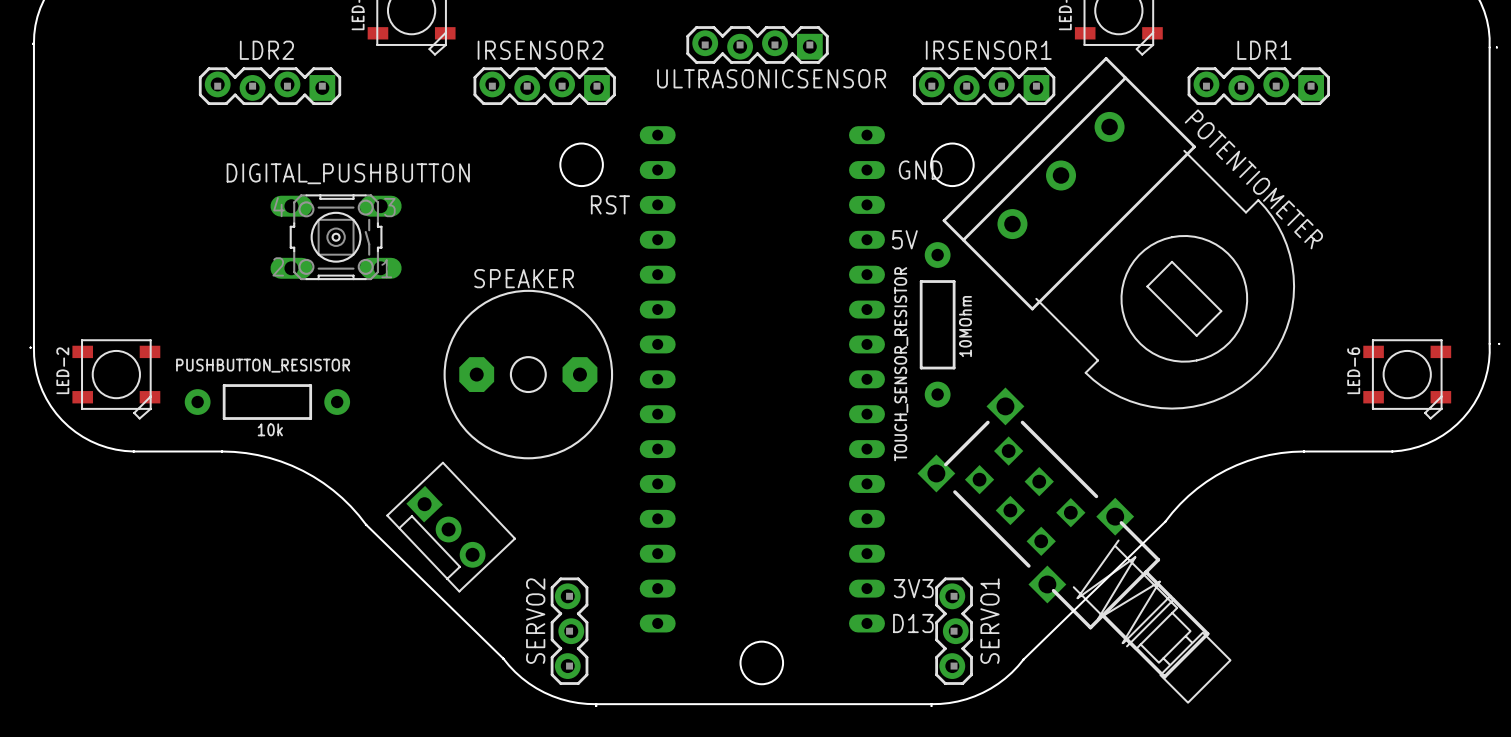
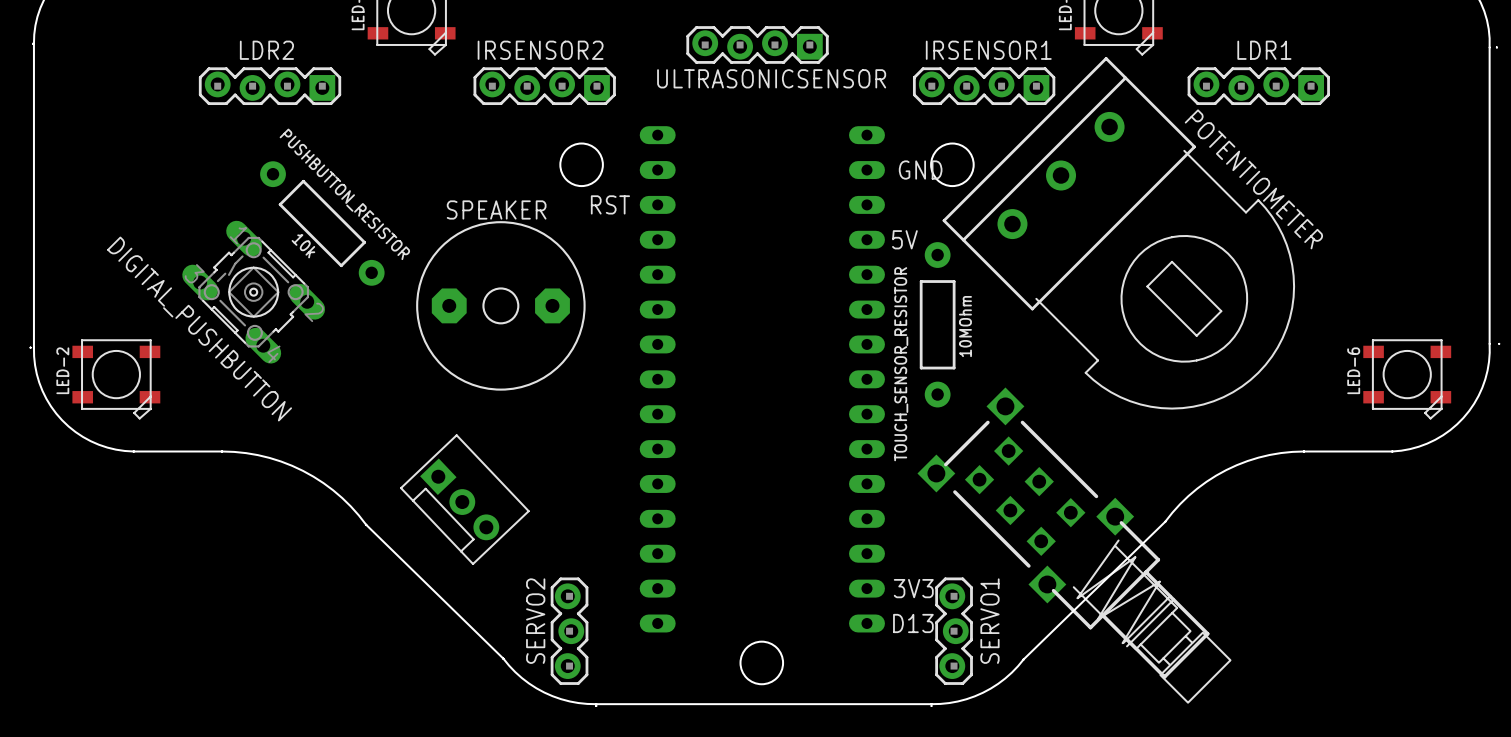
PUSHBUTTON_RESISTOR: none -> 10k (322, 223)
DIGITAL_PUSHBUTTON: (336, 237) -> none
DIGITAL_PUSHBUTTON: none -> (253, 292)
SPEAKER position: (528, 374) -> (500, 305)
PUSHBUTTON_RESISTOR: 10k (267, 402) -> none
part position: (451, 527) -> (464, 499)

